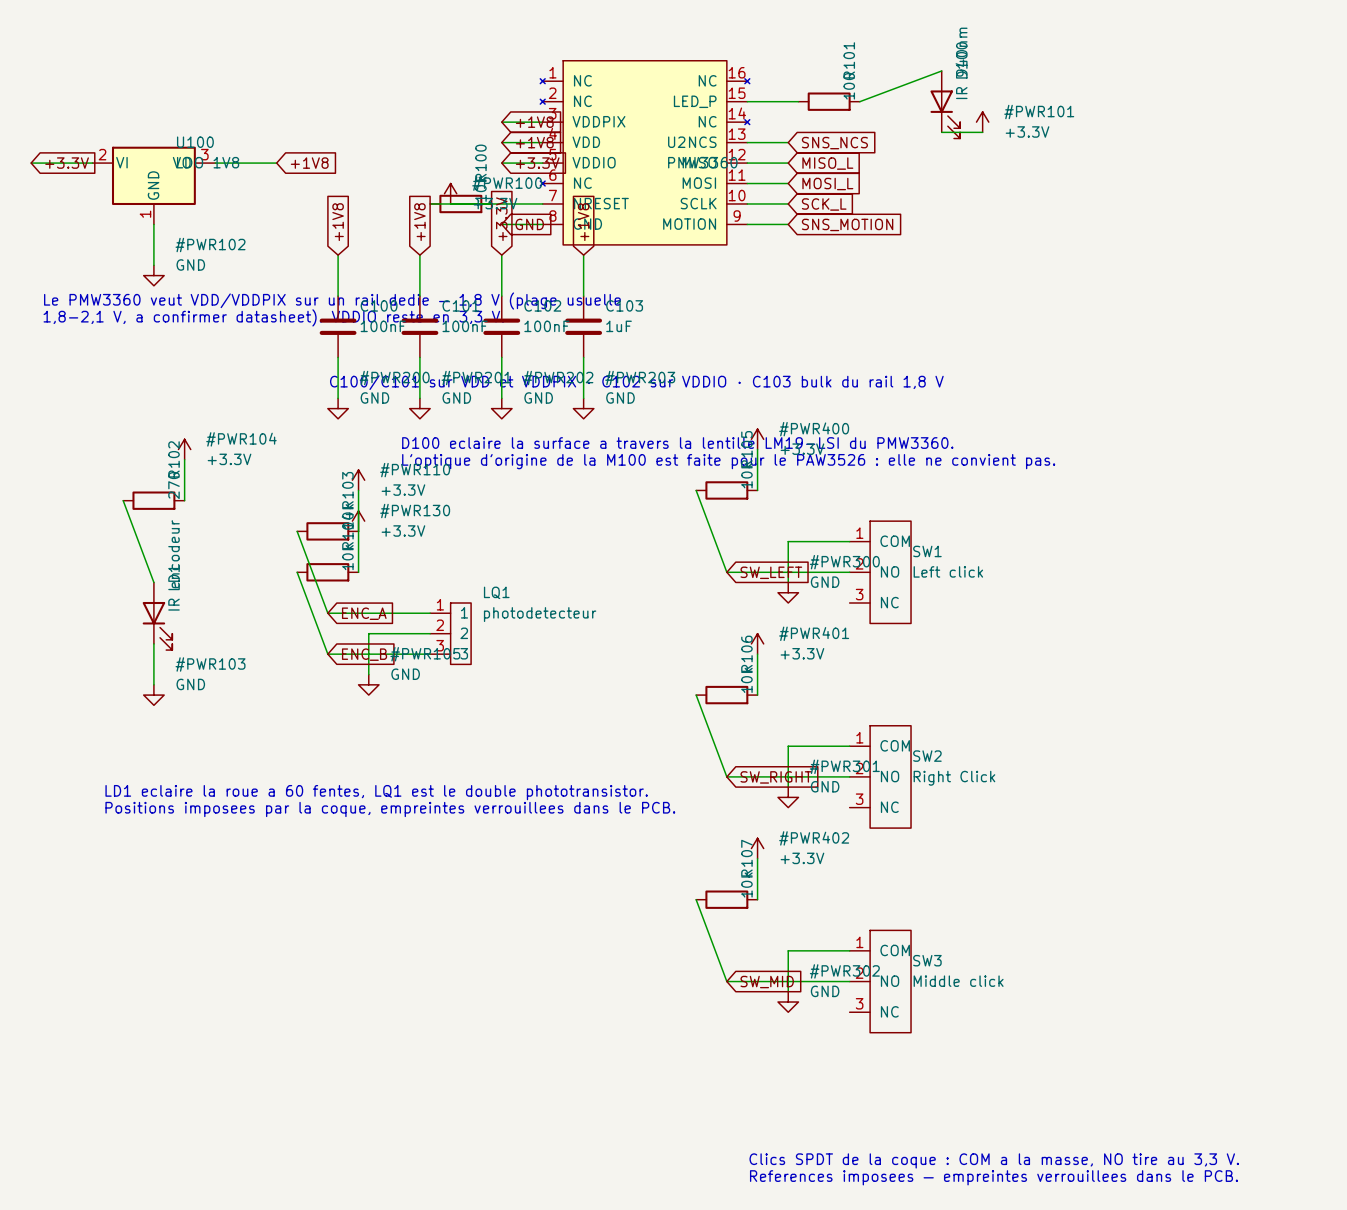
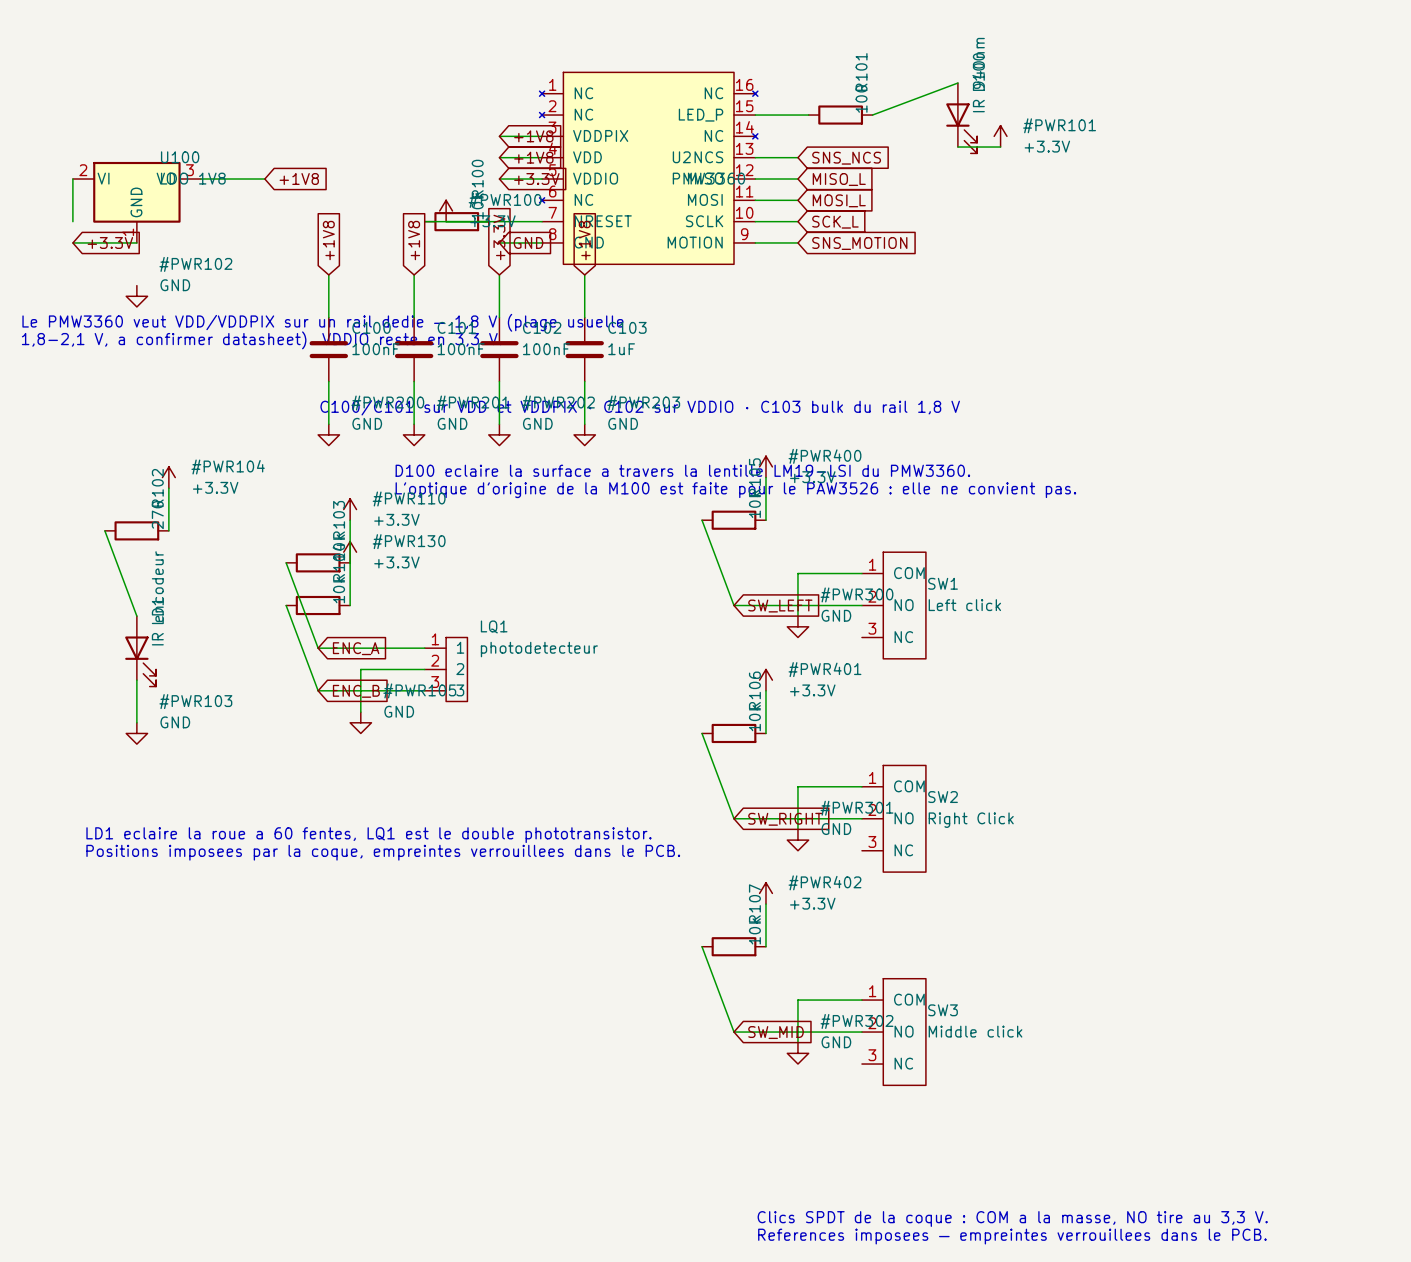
wire: (31, 163) (92, 163) -> (72, 221) (72, 179)
global label position: +3.3V (67, 163) -> +3.3V (110, 242)
wire: (153, 224) (153, 265) -> (136, 242) (72, 242)

